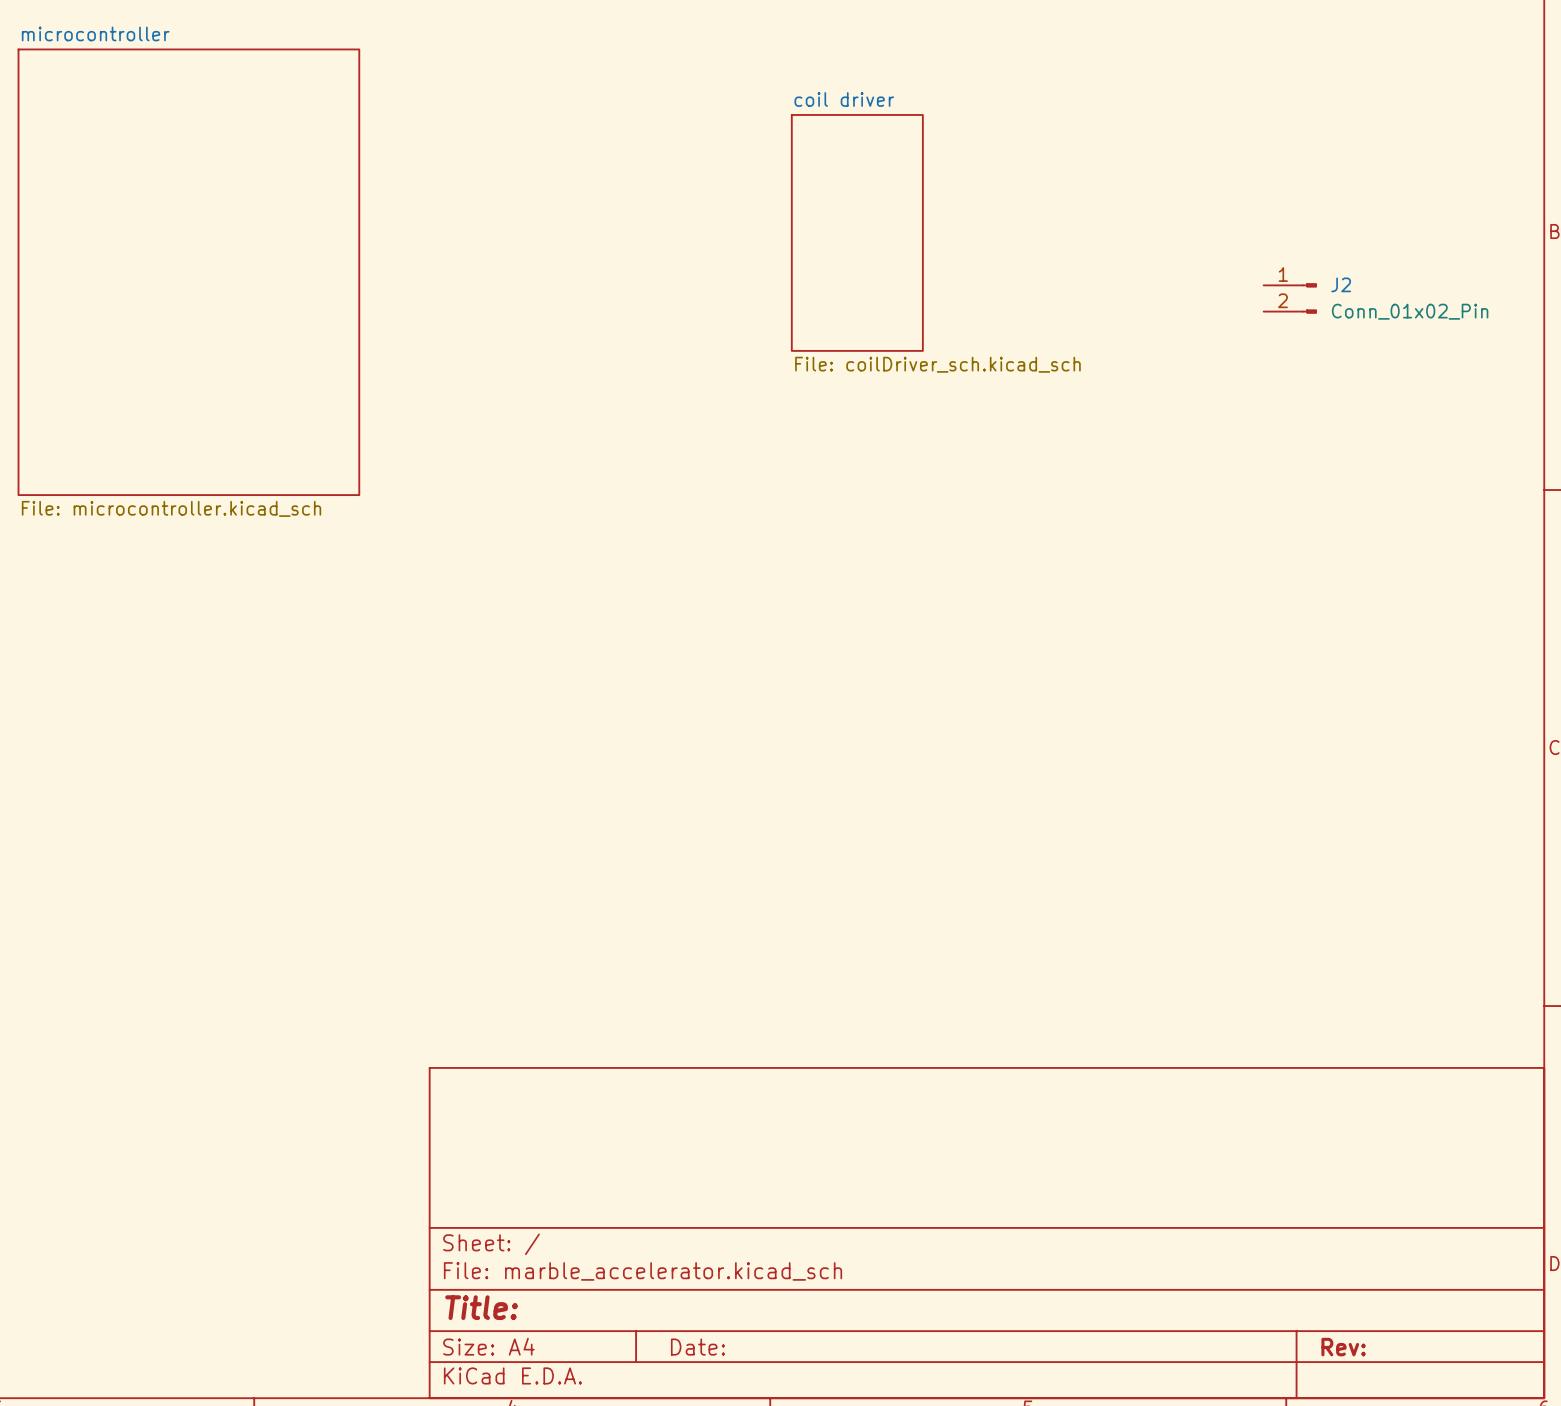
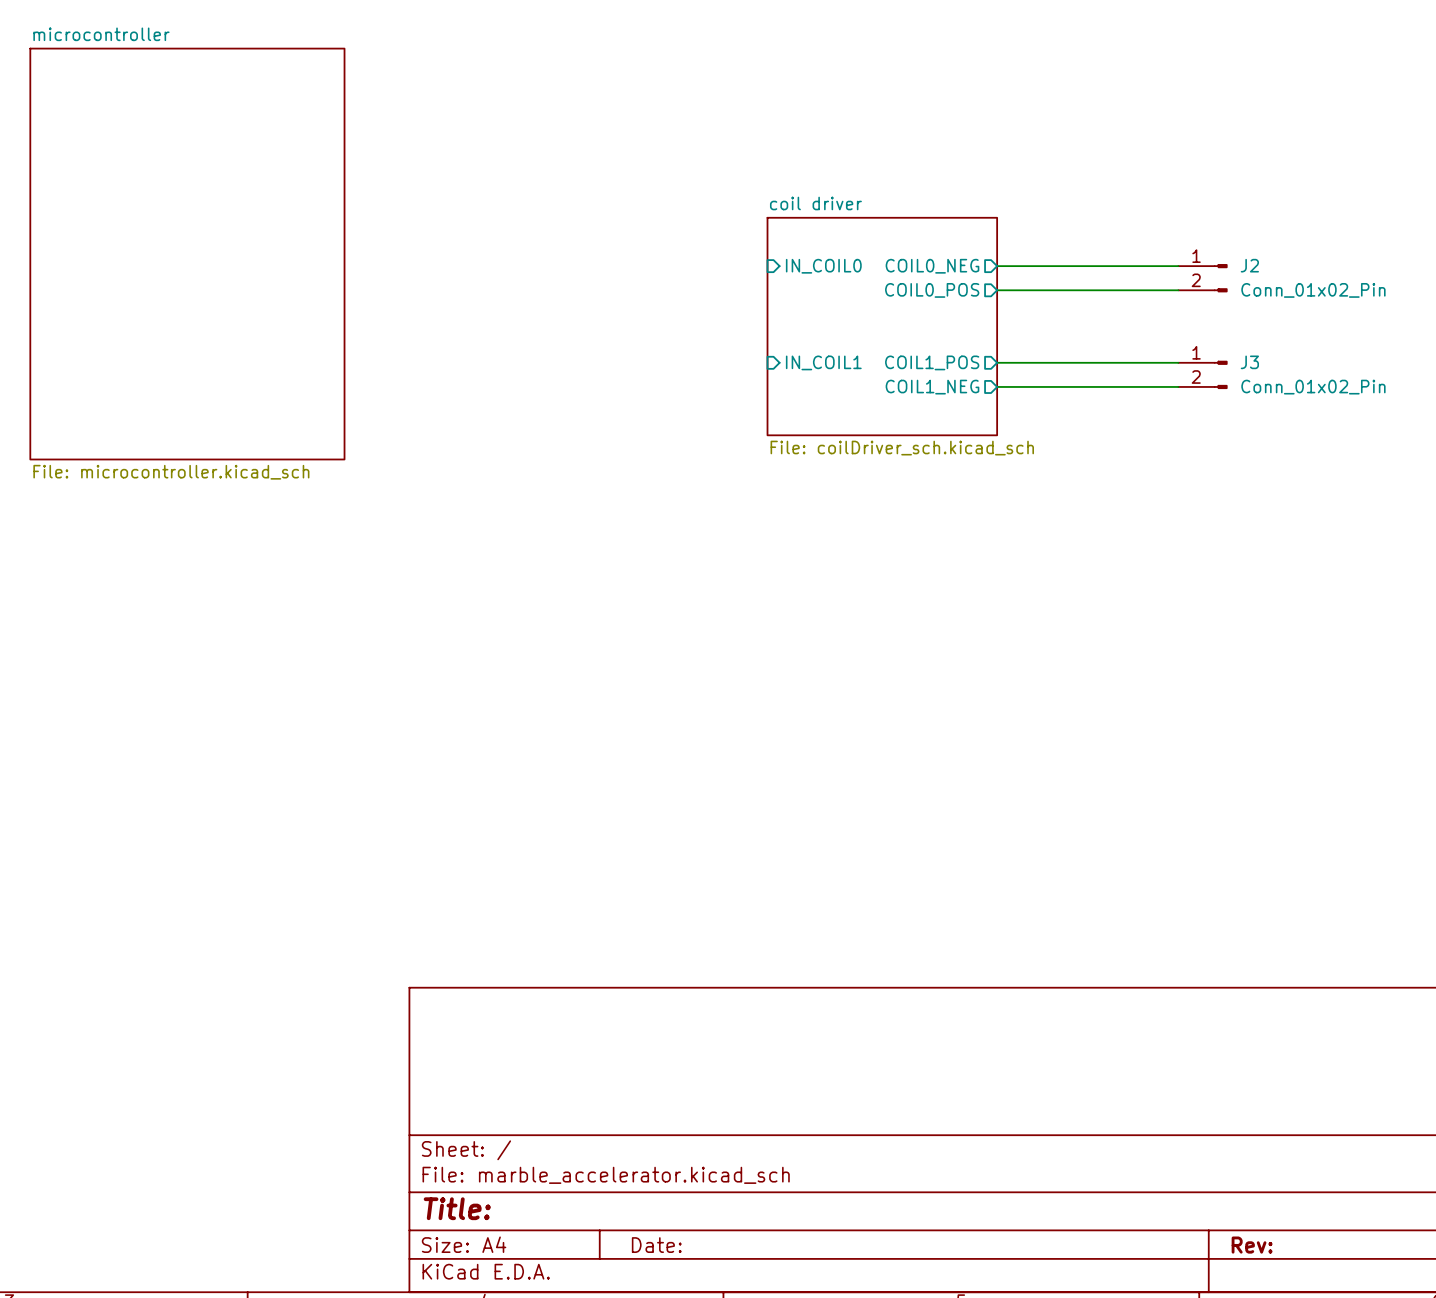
sheet coil driver: File: coilDriver_sch.kicad_sch (857, 232) -> none
sheet pin: none -> IN_COIL0 (823, 266)
sheet pin: none -> COIL0_NEG (932, 266)
wire: none -> (997, 266) (1178, 266)
sheet pin: none -> COIL0_POS (932, 290)
wire: none -> (997, 290) (1178, 290)
sheet coil driver: none -> File: coilDriver_sch.kicad_sch (882, 326)
sheet pin: none -> IN_COIL1 (823, 362)
sheet pin: none -> COIL1_POS (932, 362)
wire: none -> (997, 362) (1178, 362)
J3: none -> Conn_01x02_Pin (1202, 374)
sheet pin: none -> COIL1_NEG (932, 387)
wire: none -> (997, 386) (1178, 386)

